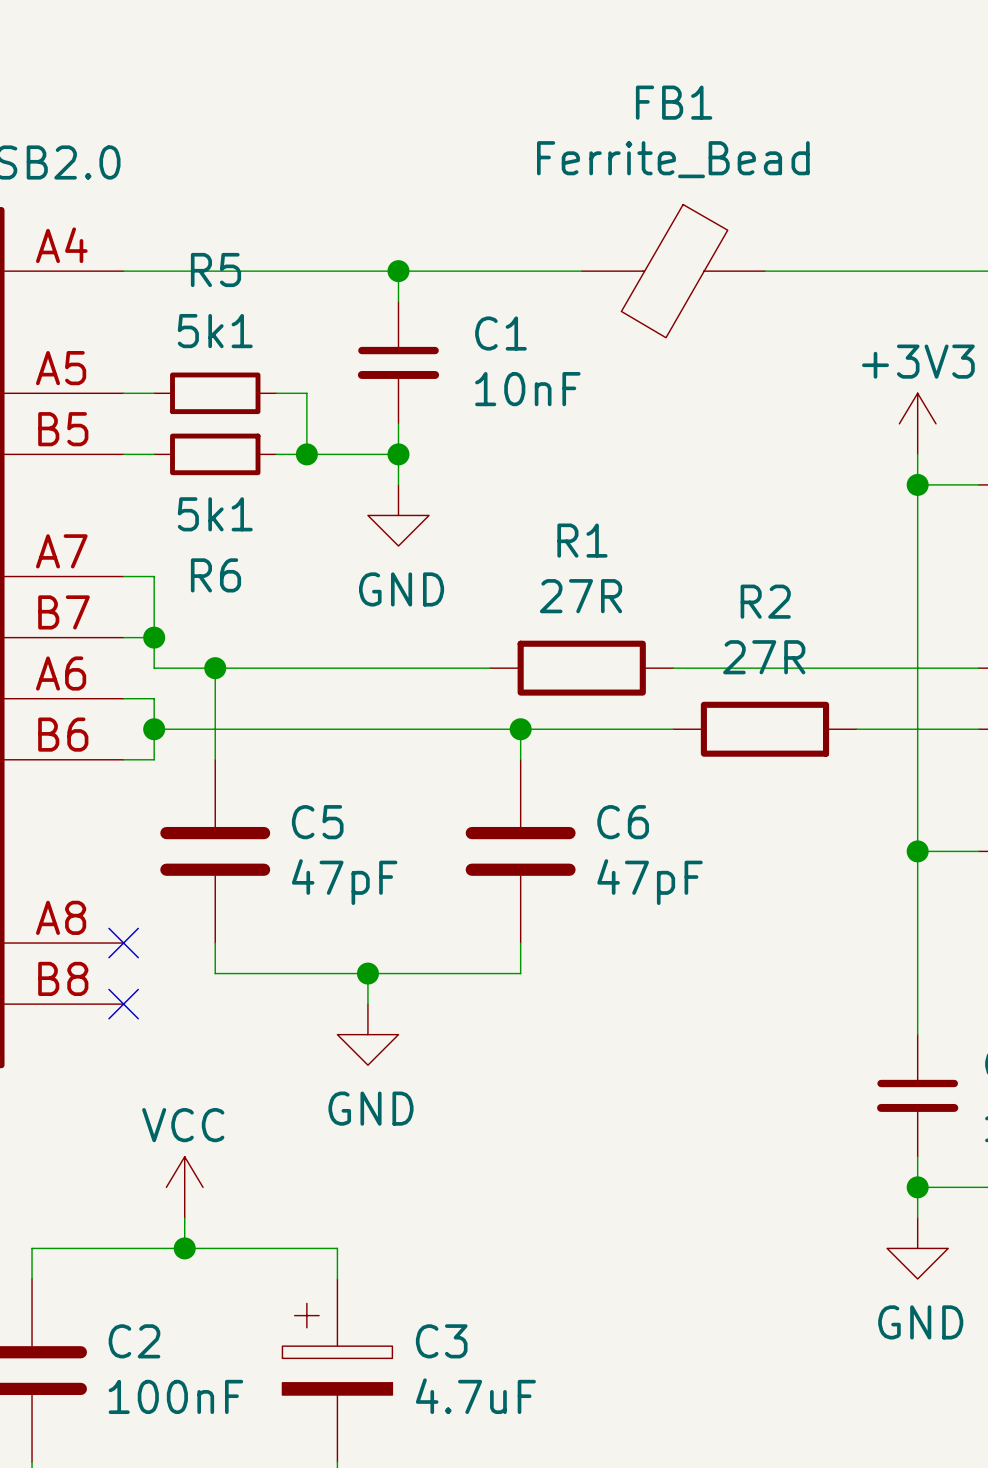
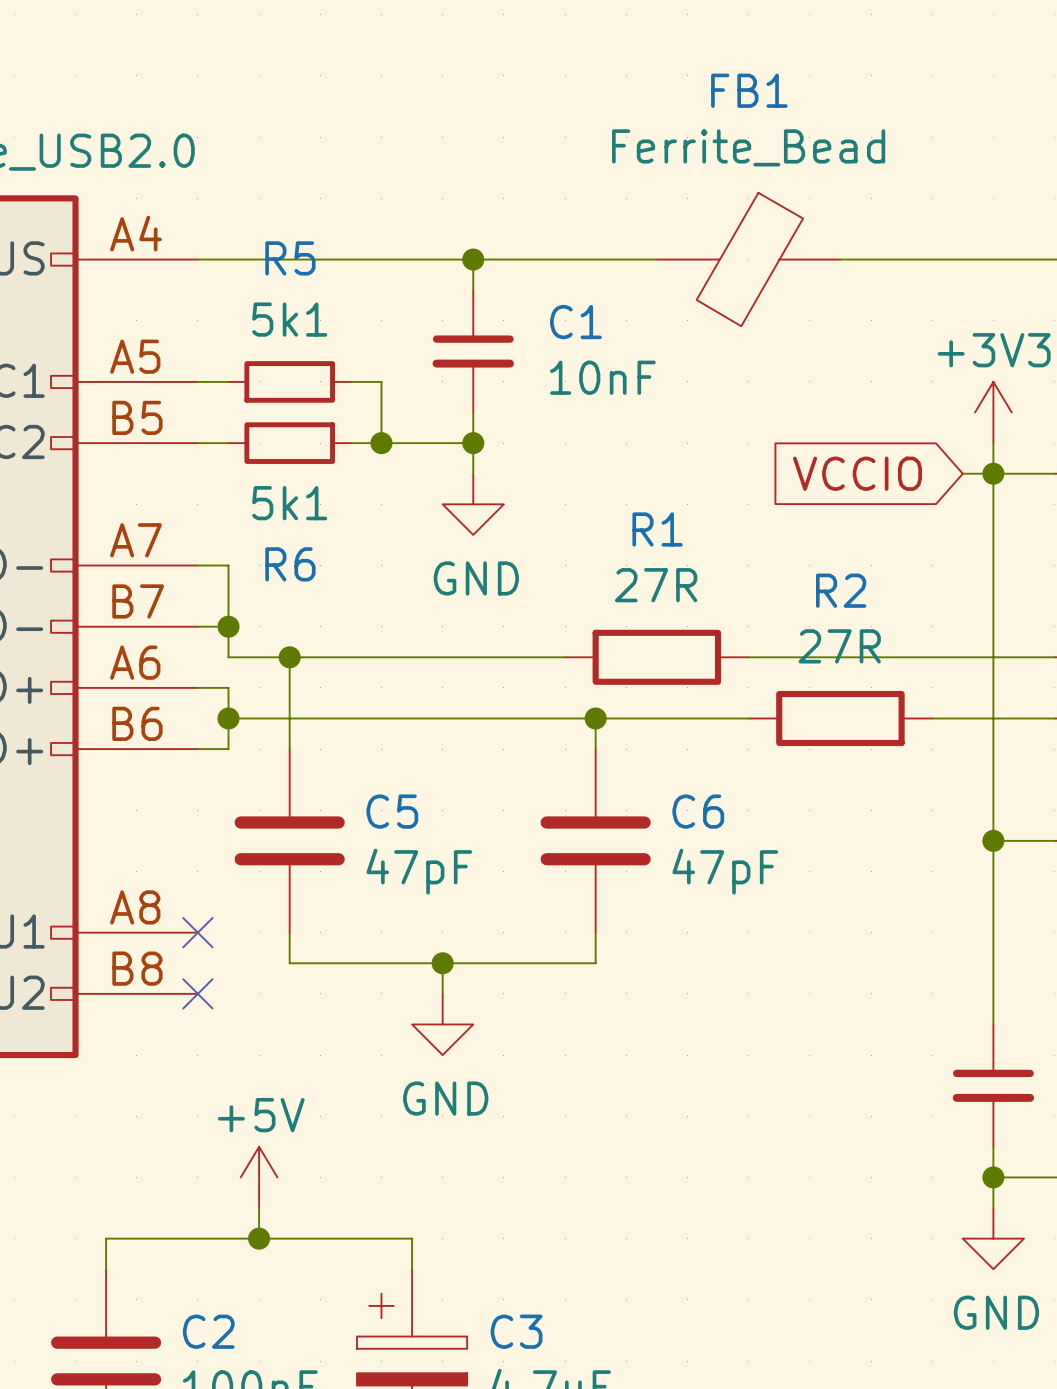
global label: none -> VCCIO (857, 473)
wire: none -> (962, 473) (993, 473)
power symbol: VCC (184, 1187) -> +5V (259, 1177)

